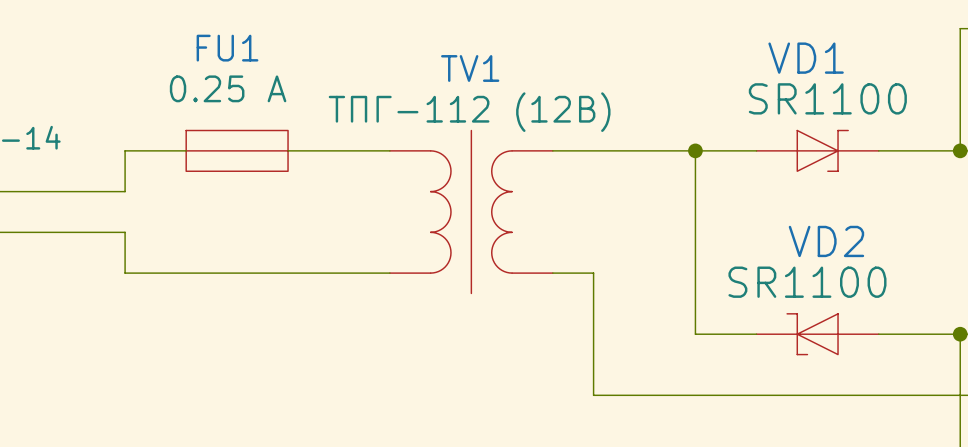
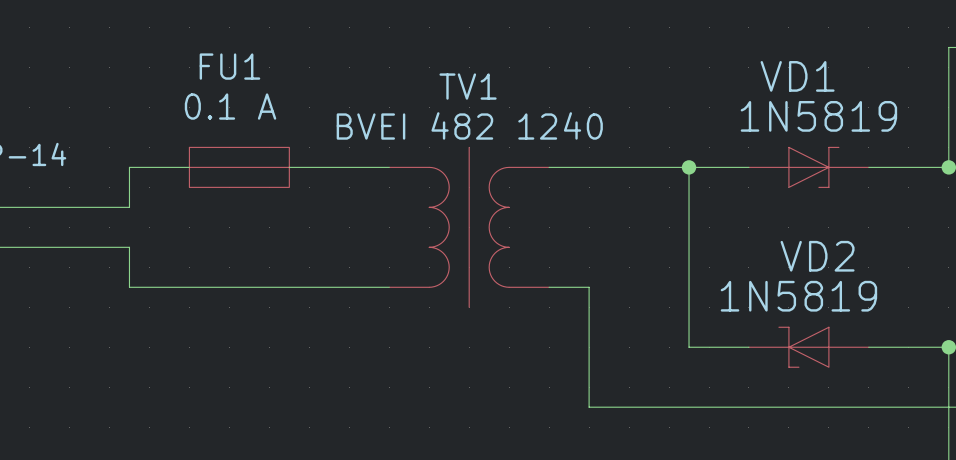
FU1 value: 0.25 A (228, 88) -> 0.1 A (230, 106)
VD1 value: SR1100 (827, 98) -> 1N5819 (818, 116)
TV1 value: ТПГ-112 (12В) (469, 112) -> BVEI 482 1240 (469, 125)
VD2 value: SR1100 (807, 282) -> 1N5819 (798, 296)

